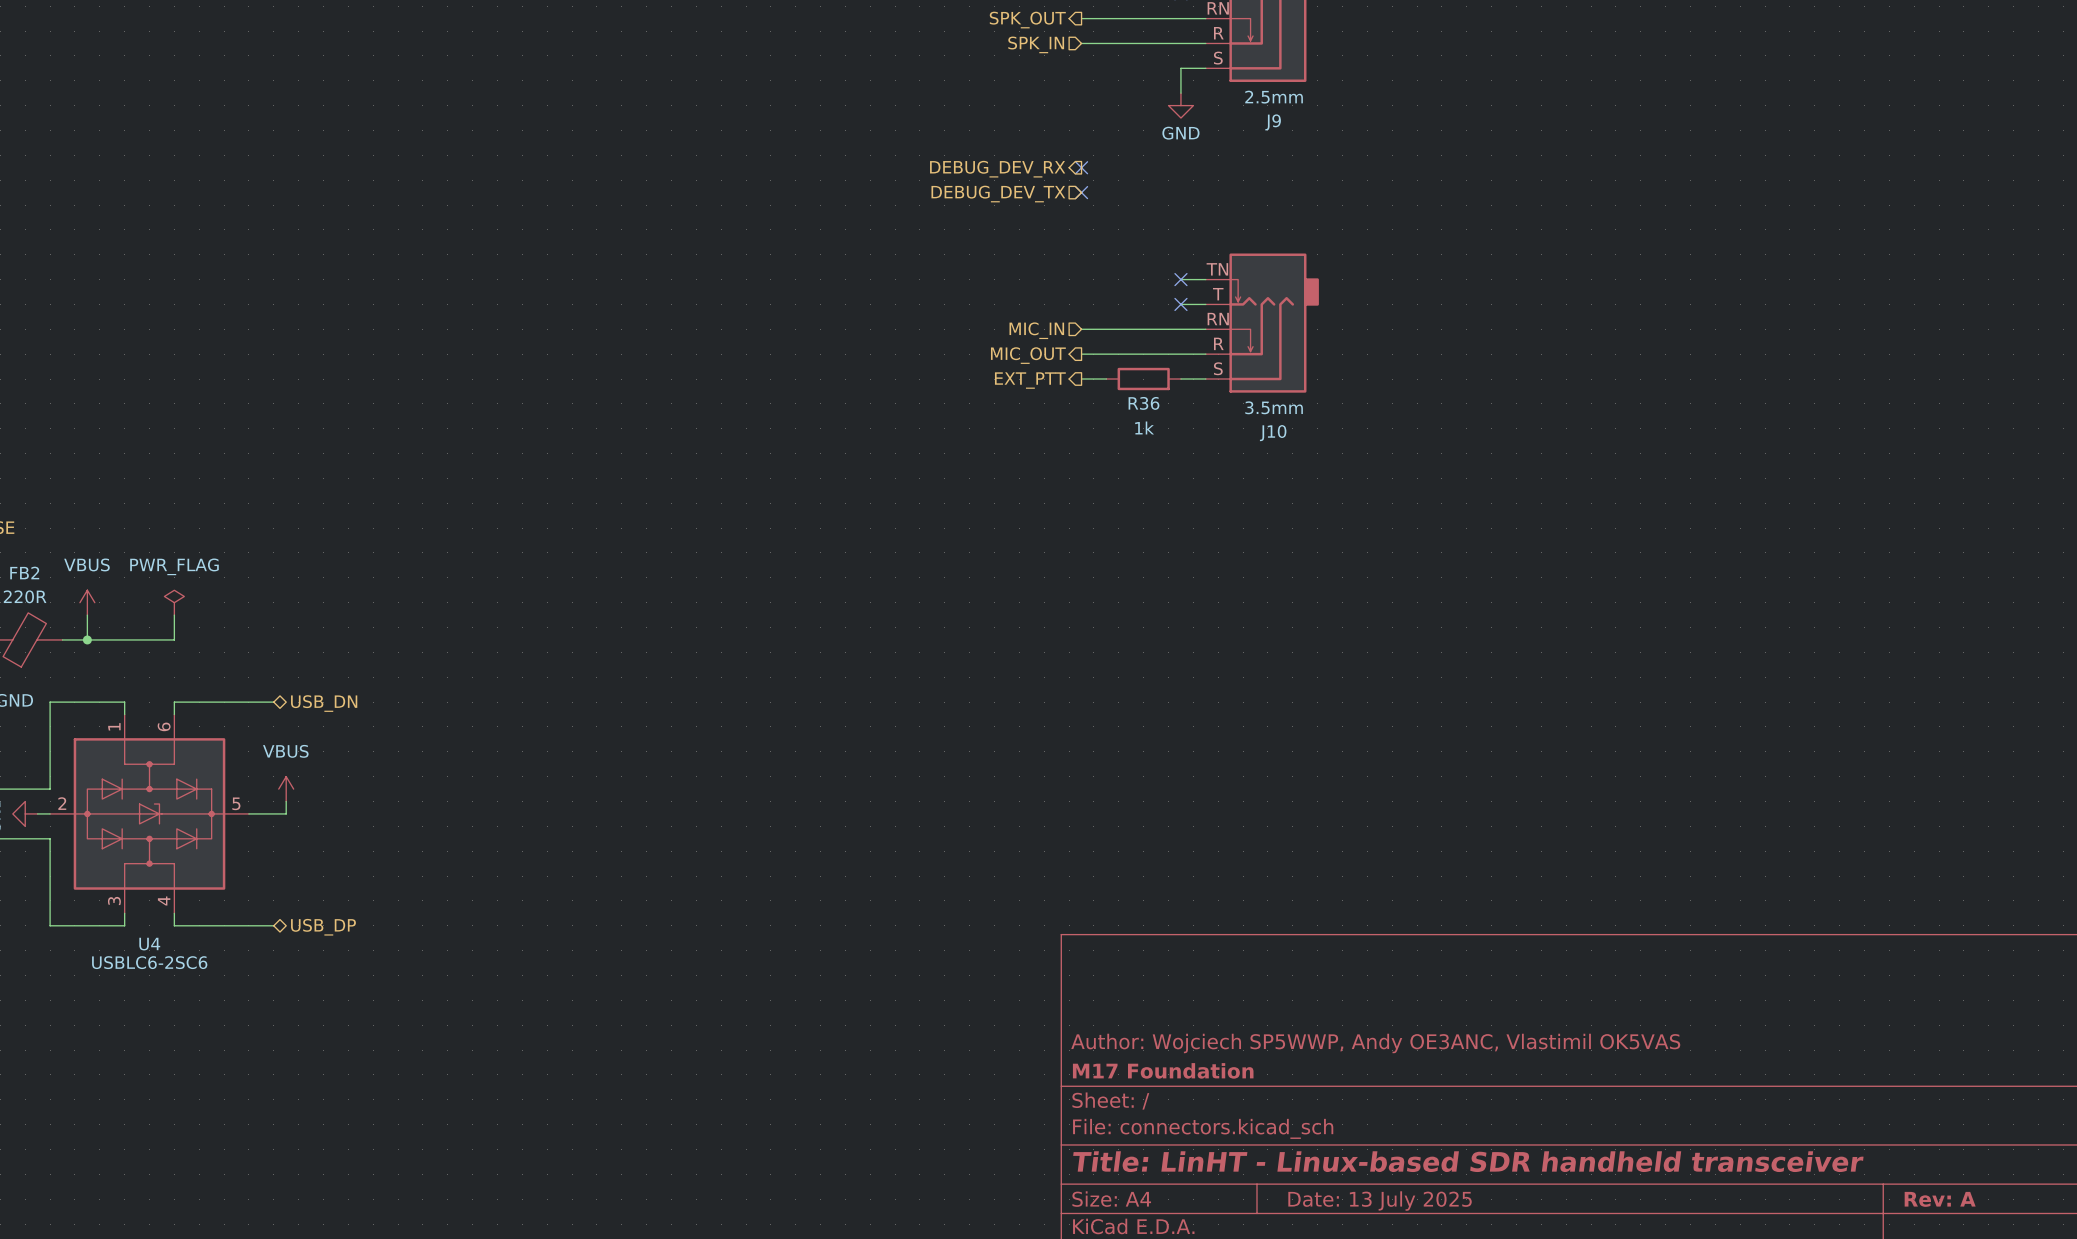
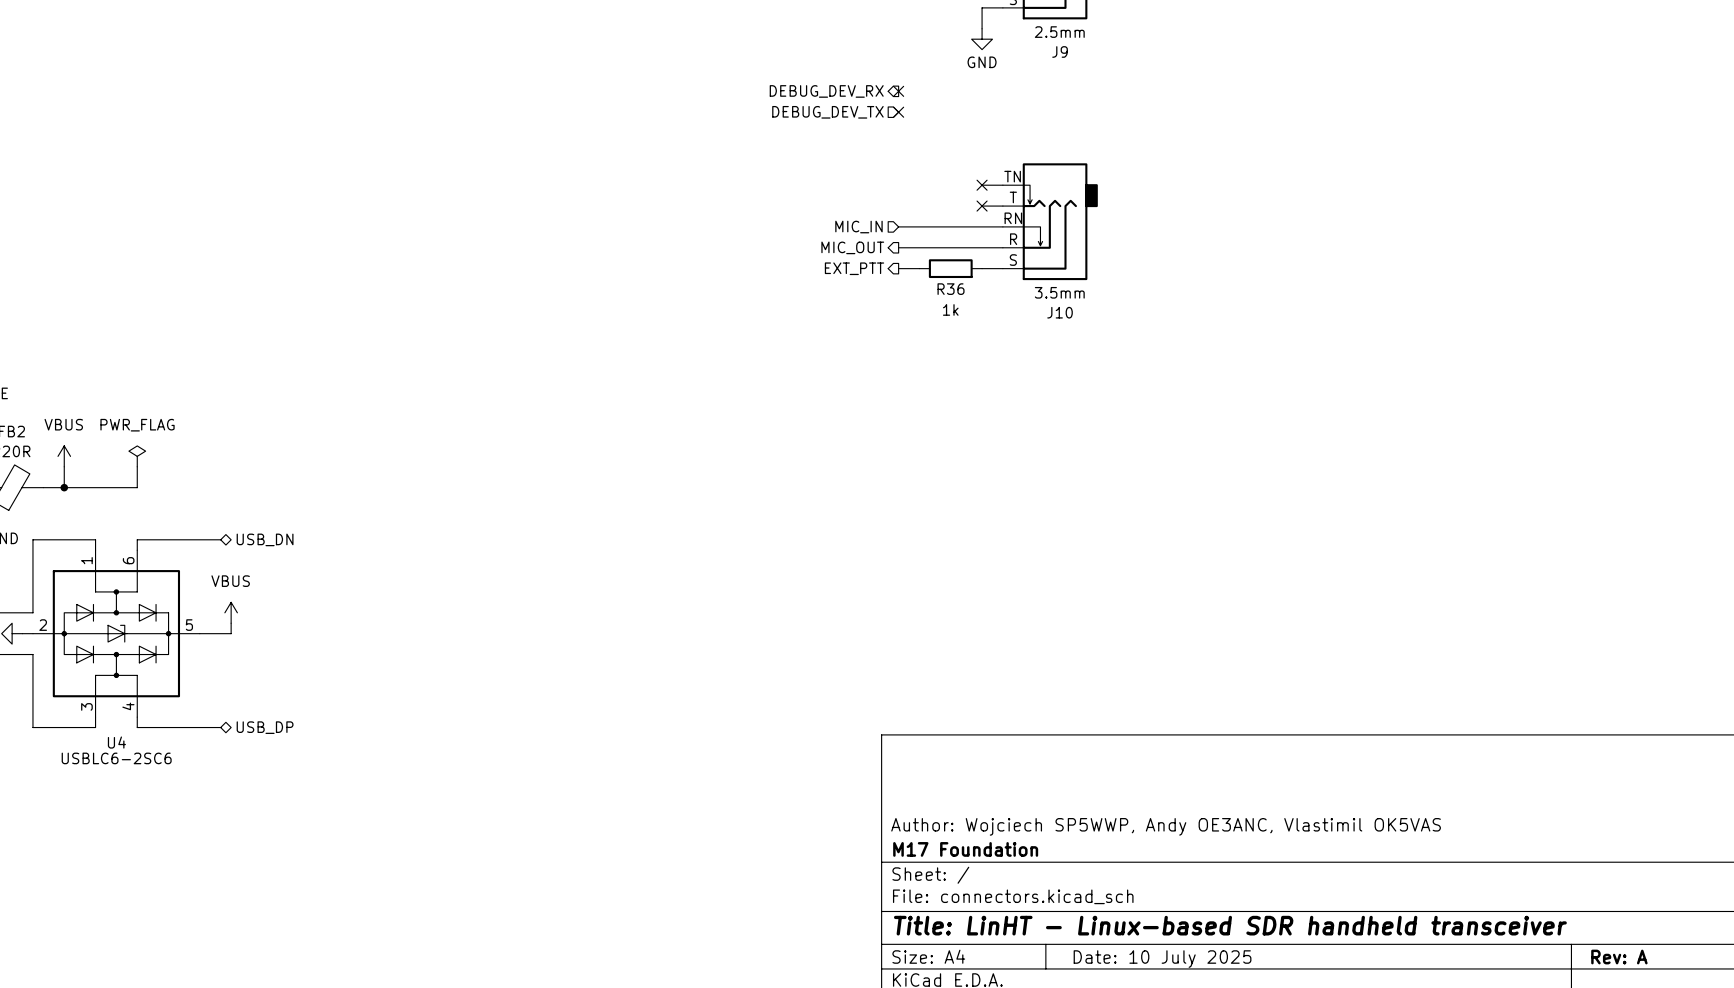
title block: Date: 13 July 2025 (1380, 1201) -> Date: 10 July 2025 (1162, 959)

